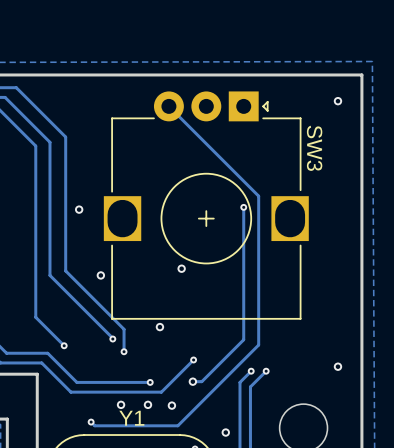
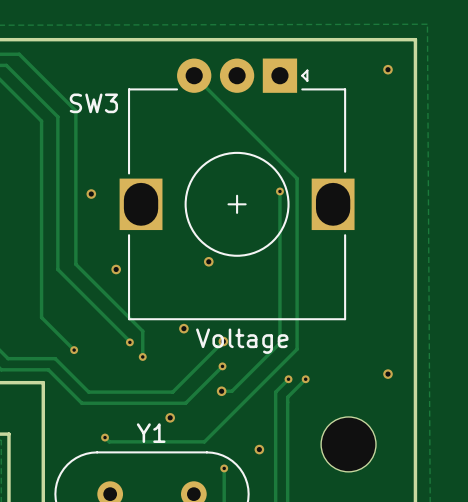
SW3 name rotation: 0° (314, 148) -> 90° counterclockwise (93, 103)
SW3 name position: SW3 (314, 148) -> SW3 (93, 103)
SW3 value: none -> Voltage (242, 341)
track: none -> (223, 341) (172, 392)
via: none -> (223, 341)
via: (150, 382) -> none
via: (121, 404) -> none
via: (171, 405) -> none

